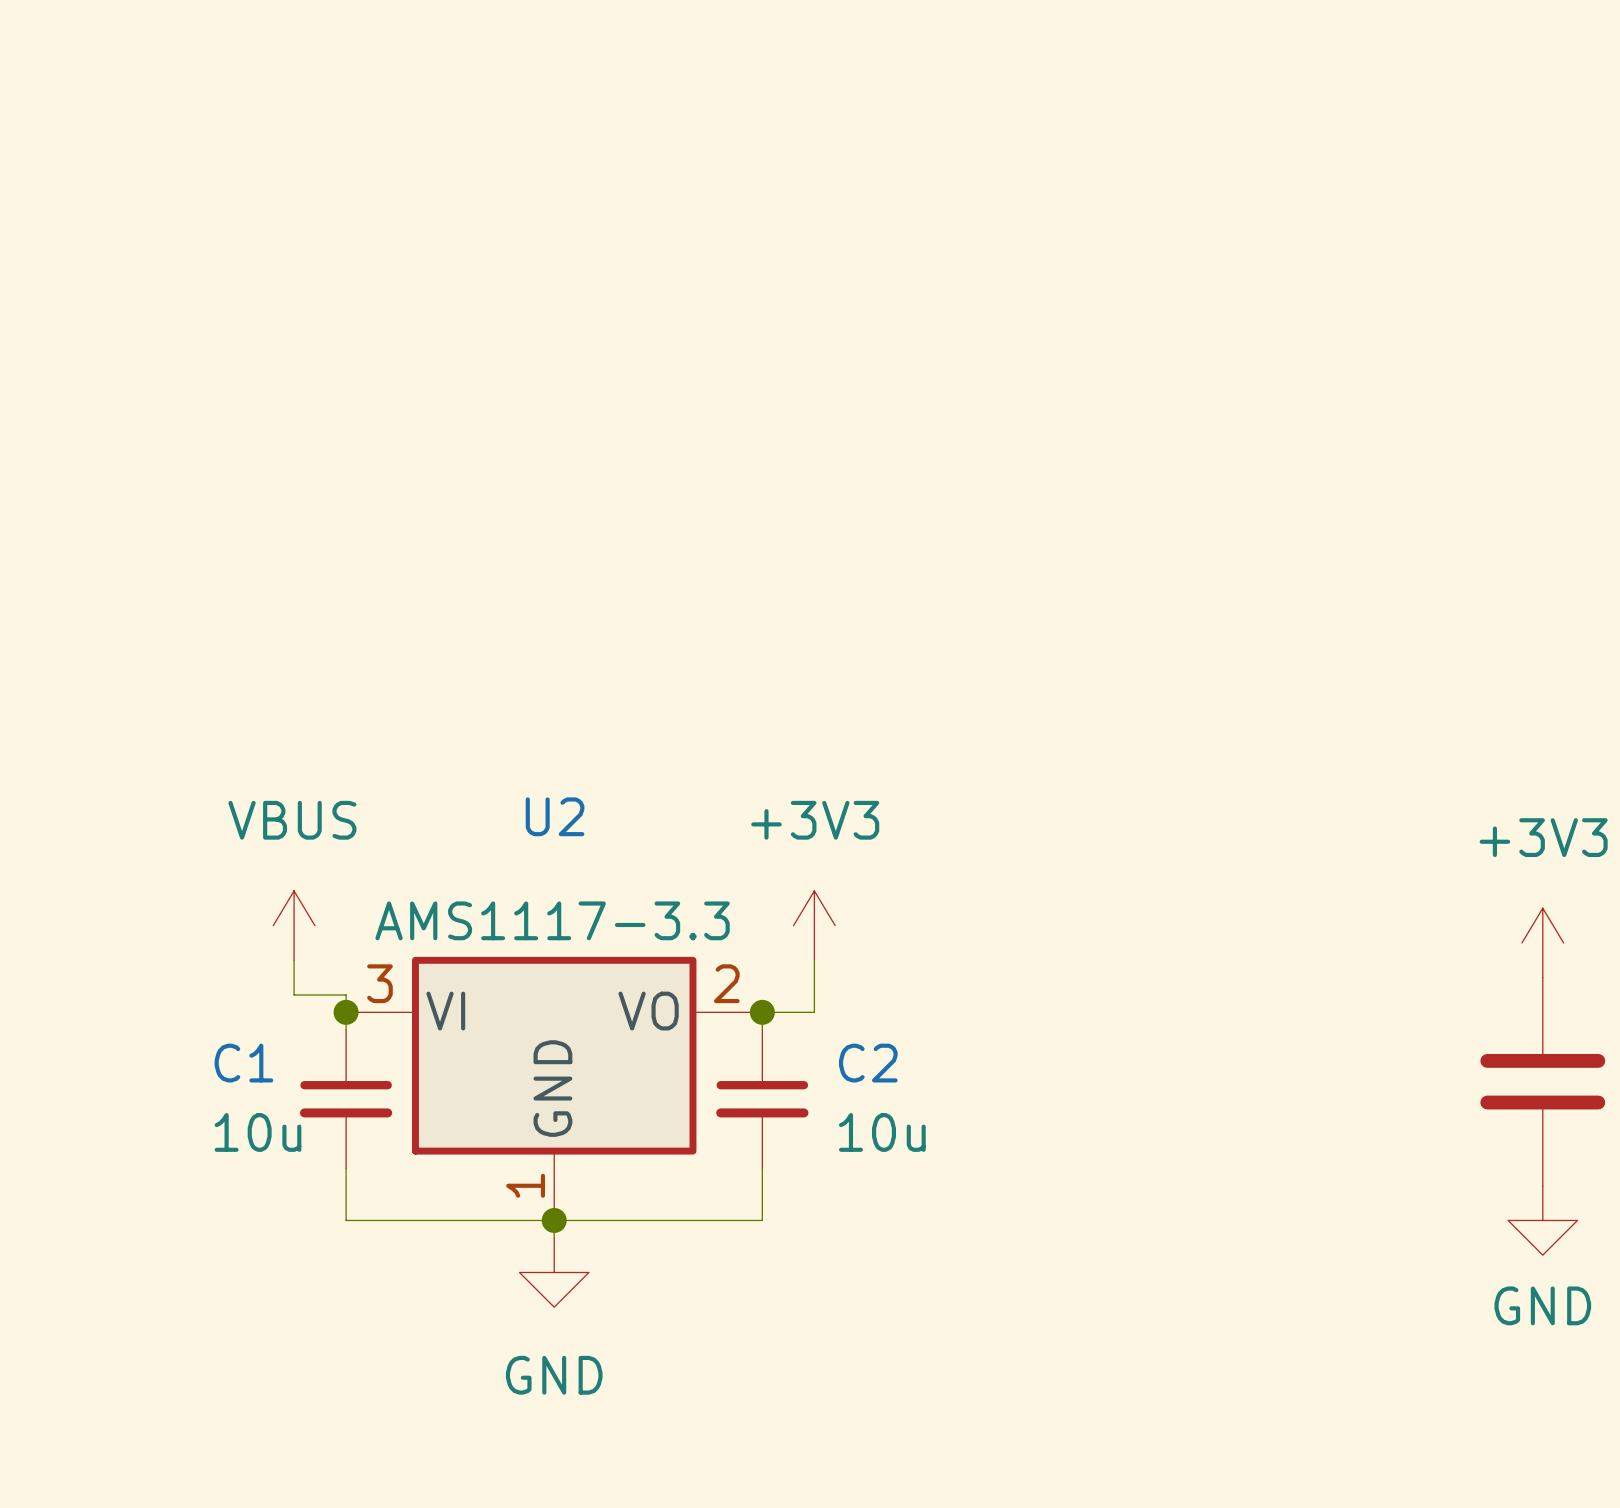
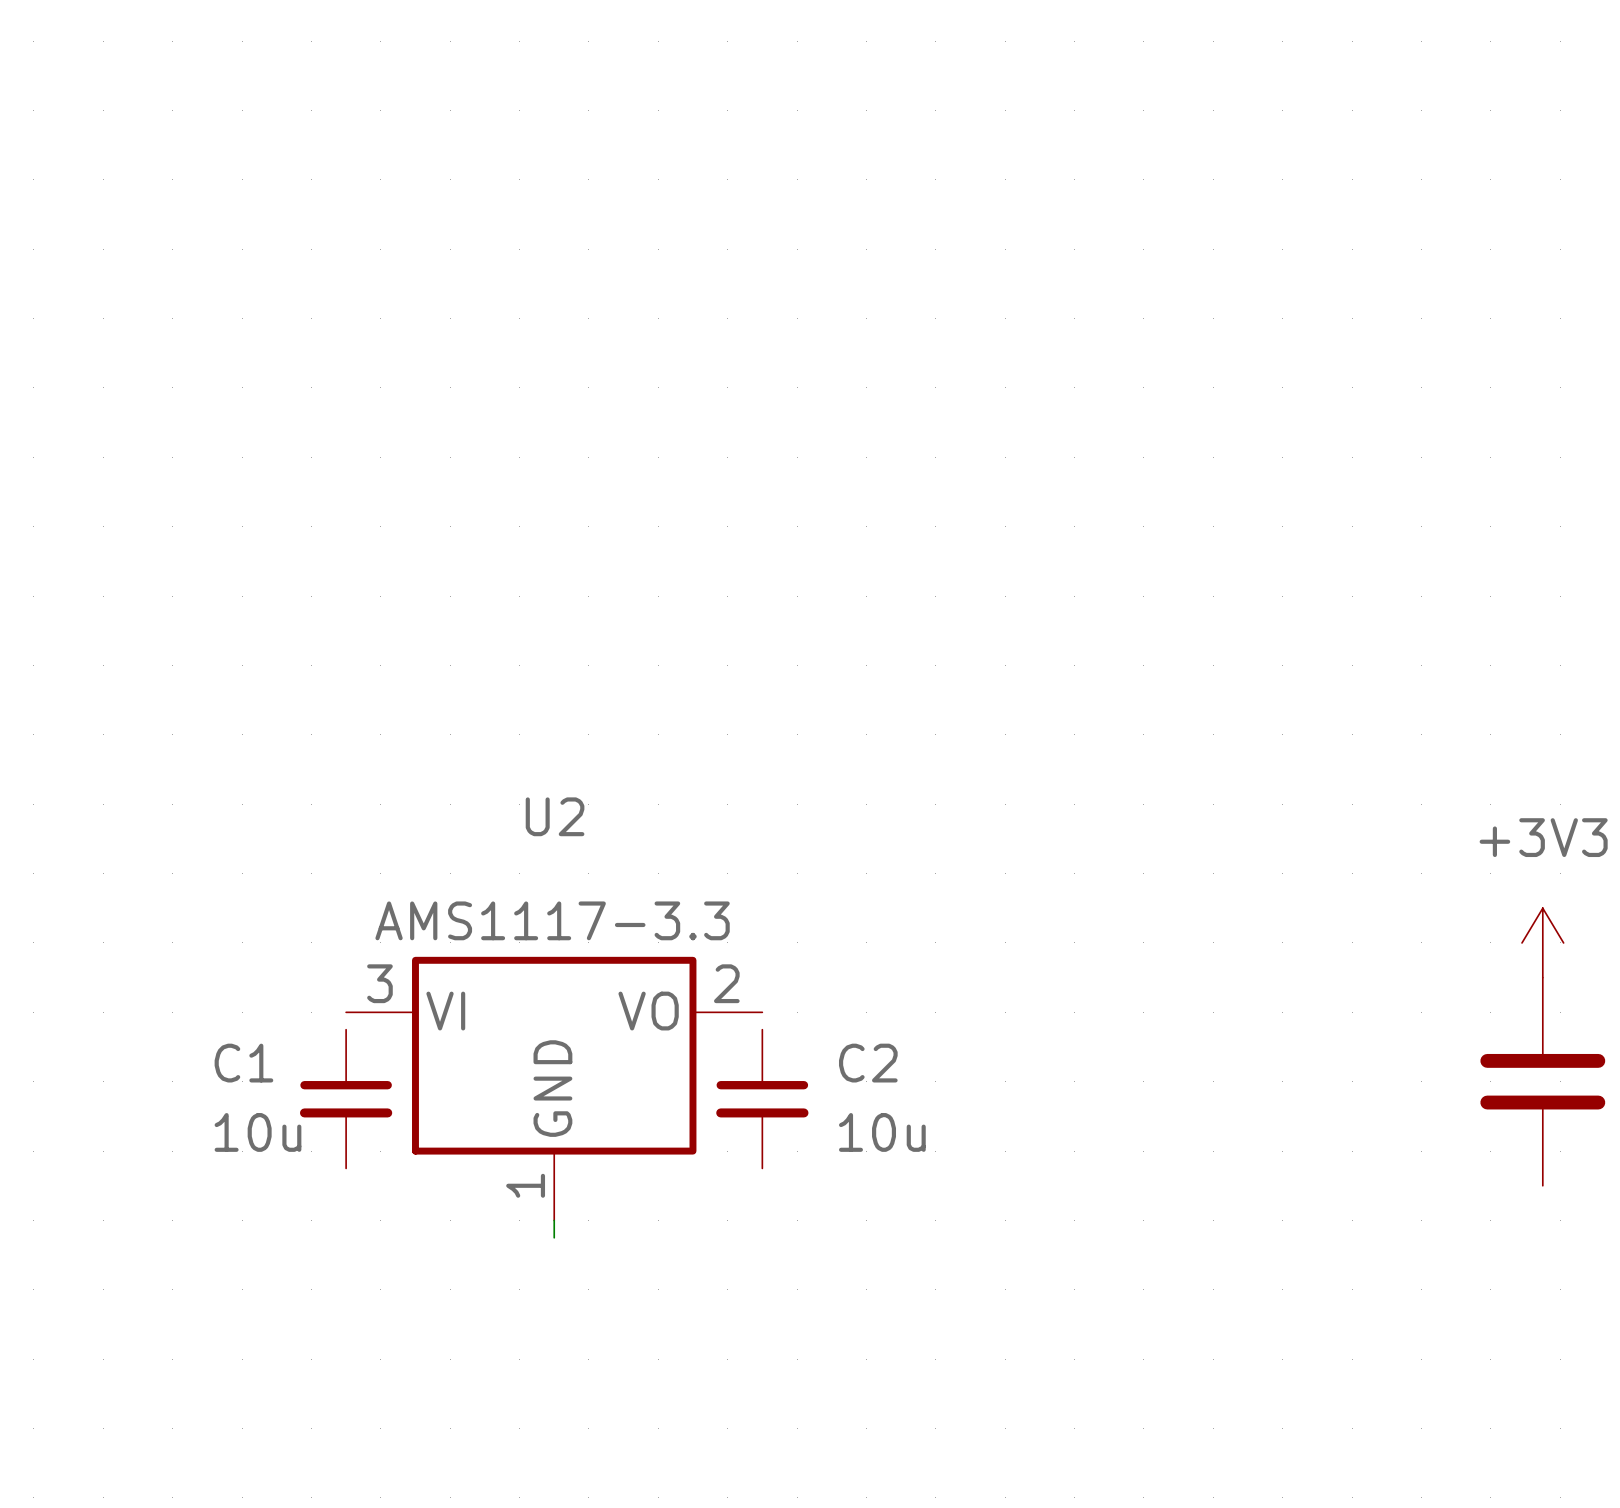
power symbol: VBUS (294, 925) -> none
power symbol: +3V3 (814, 925) -> none
wire: (294, 960) (294, 995) (346, 995) (346, 1029) -> none
wire: (814, 960) (814, 1012) (762, 1012) (762, 1029) -> none
junction: (346, 1012) -> none
junction: (762, 1012) -> none
wire: (346, 1168) (346, 1220) (762, 1220) (762, 1168) -> none
junction: (554, 1220) -> none
power symbol: GND (1542, 1220) -> none
power symbol: GND (554, 1272) -> none

